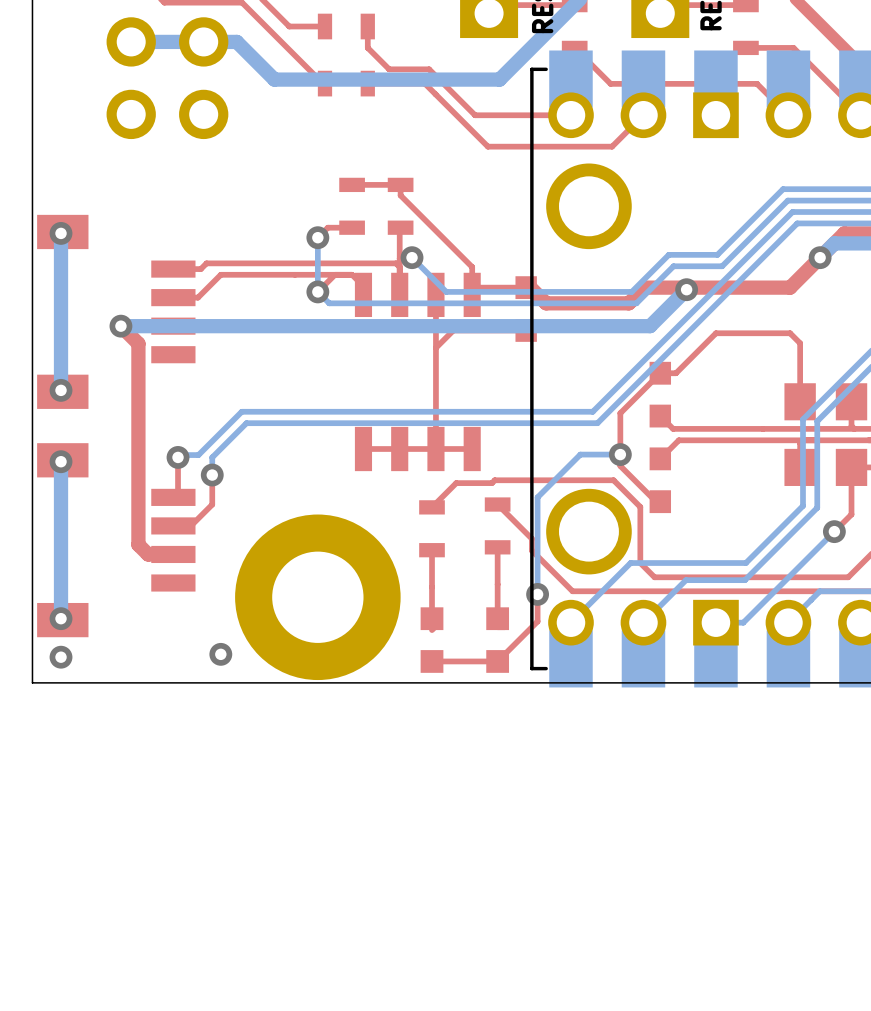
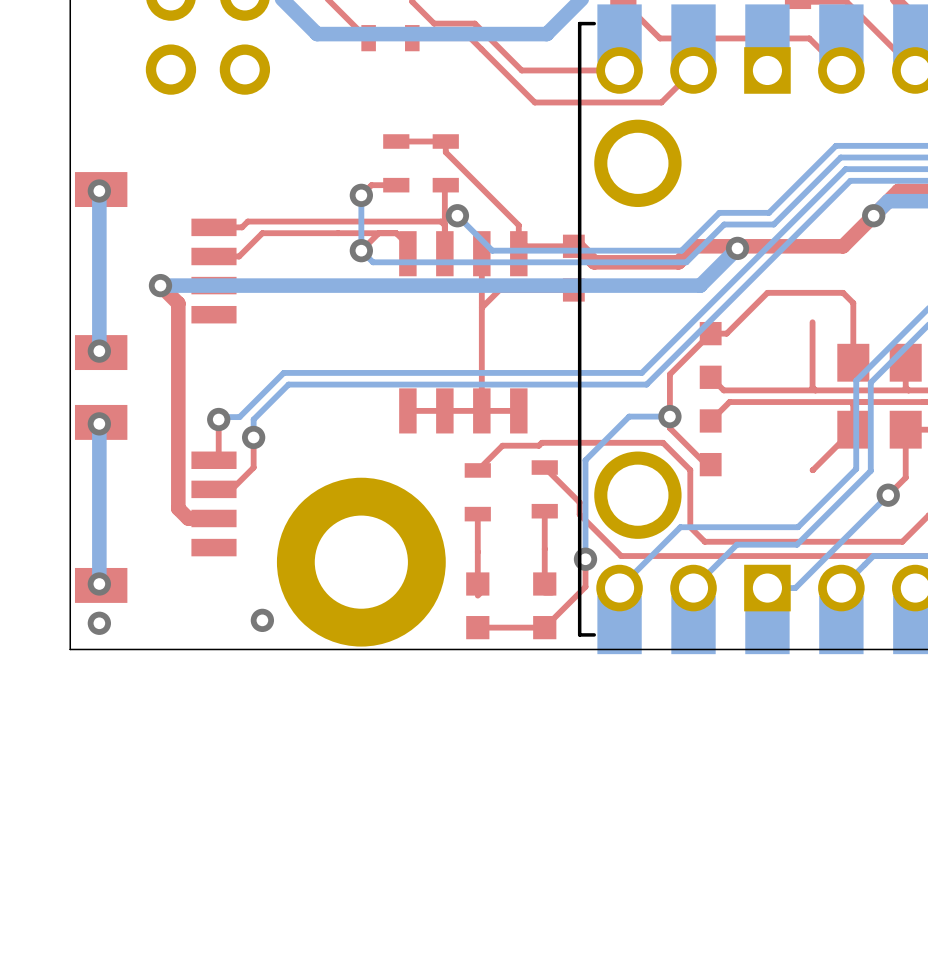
top track: none -> (812, 322) (812, 387) (815, 390)
top track: none -> (853, 429) (812, 470)

